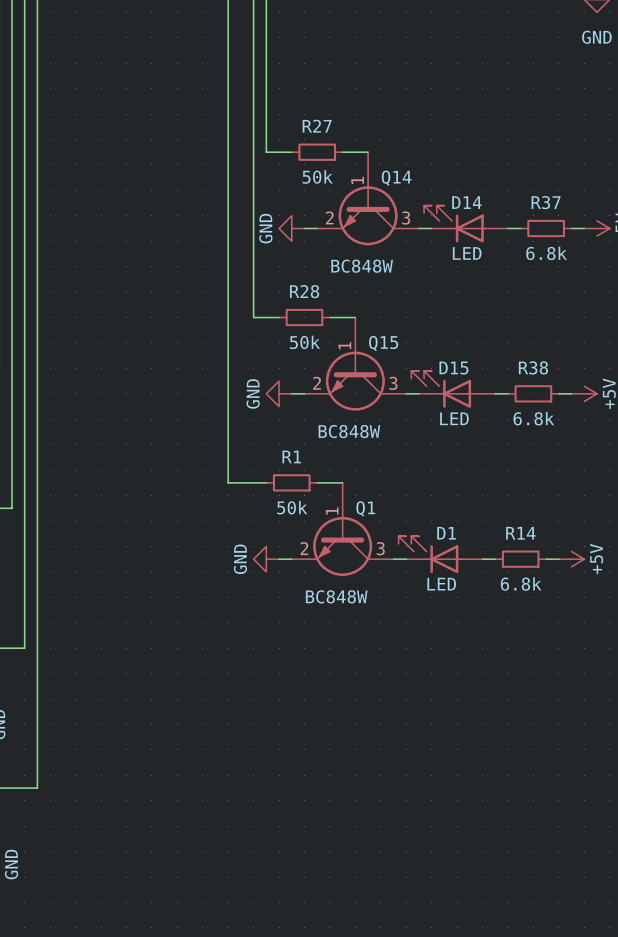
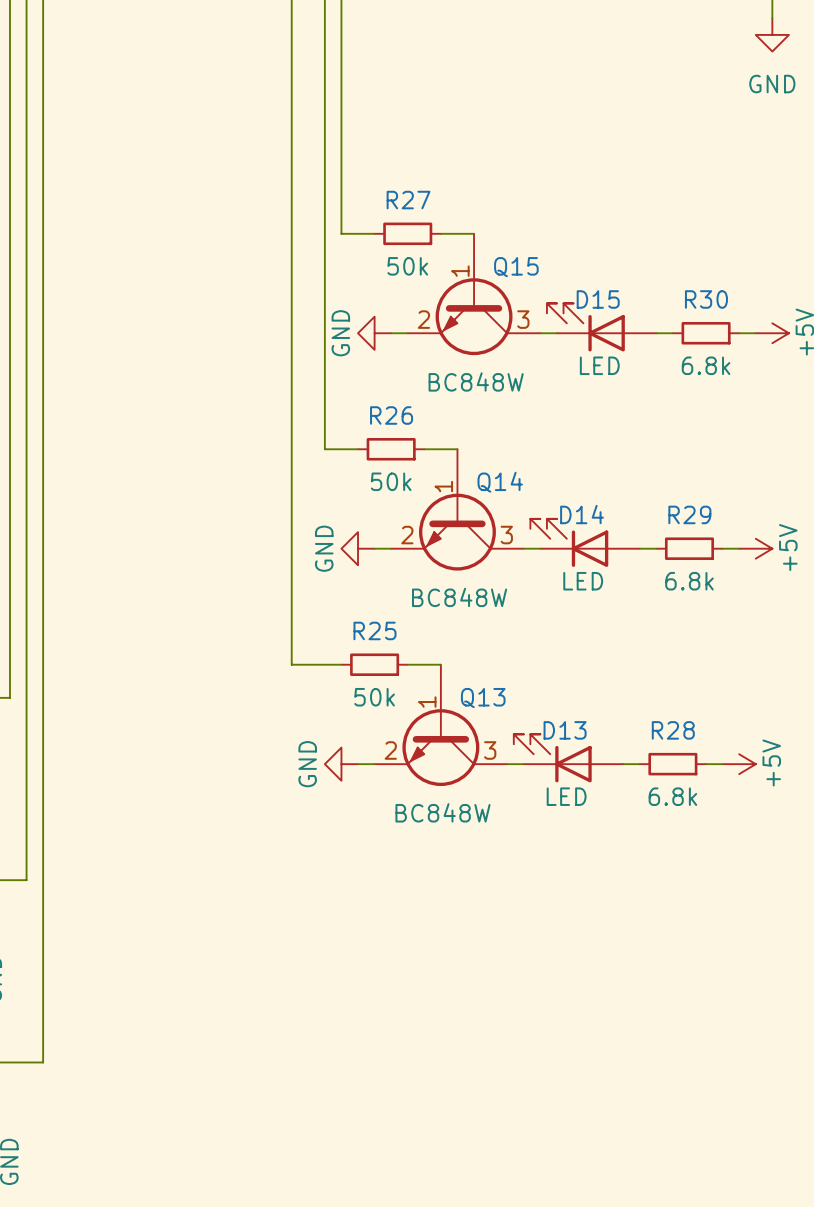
Q14 name: Q14 (396, 178) -> Q15 (516, 267)
D14 name: D14 (466, 202) -> D15 (598, 299)
R37 name: R37 (546, 202) -> R30 (706, 299)
R28 name: R28 (304, 291) -> R26 (391, 415)
Q15 name: Q15 (383, 343) -> Q14 (500, 482)
R38 name: R38 (533, 367) -> R29 (689, 514)
D15 name: D15 (453, 368) -> D14 (582, 514)
R1 name: R1 (291, 456) -> R25 (374, 630)
Q1 name: Q1 (365, 508) -> Q13 (483, 698)
D1 name: D1 (446, 533) -> D13 (565, 730)
R14 name: R14 (520, 533) -> R28 (673, 730)

